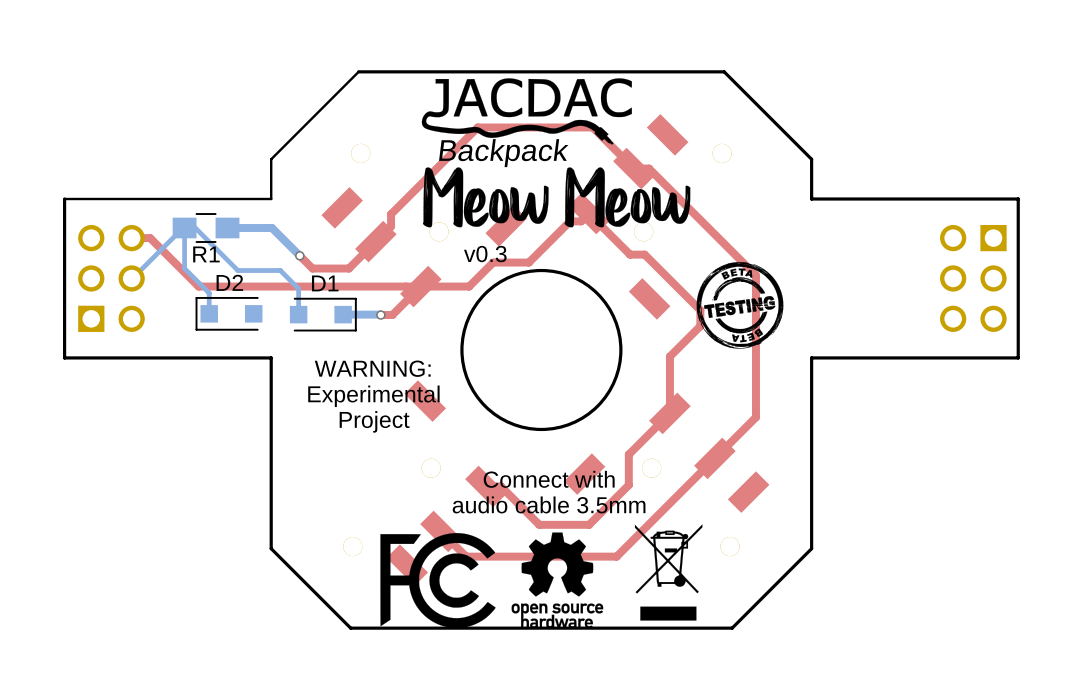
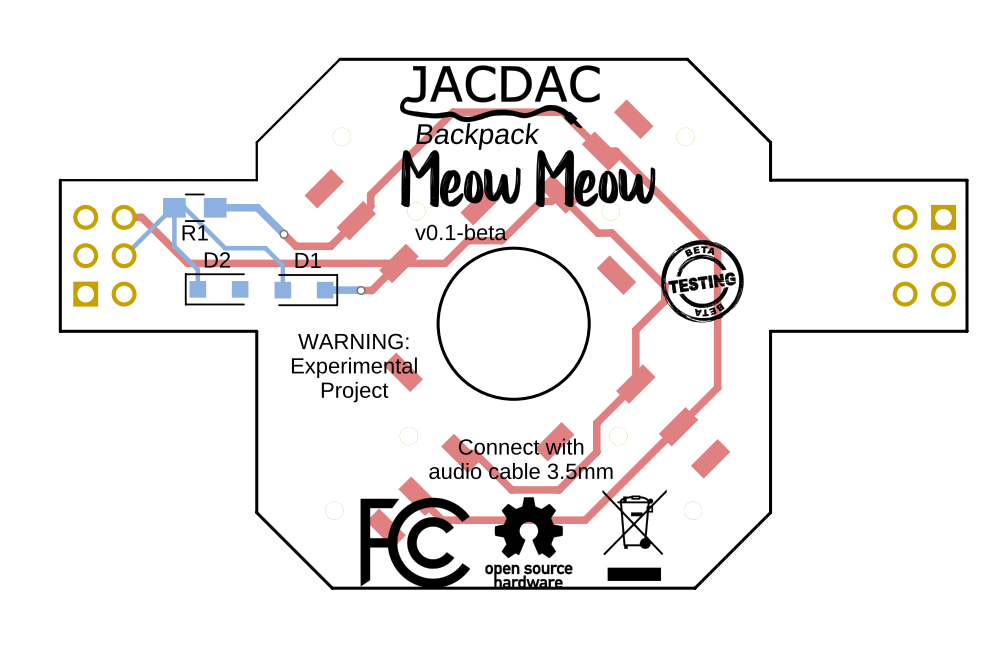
text: v0.3 (485, 254) -> v0.1-beta (460, 232)

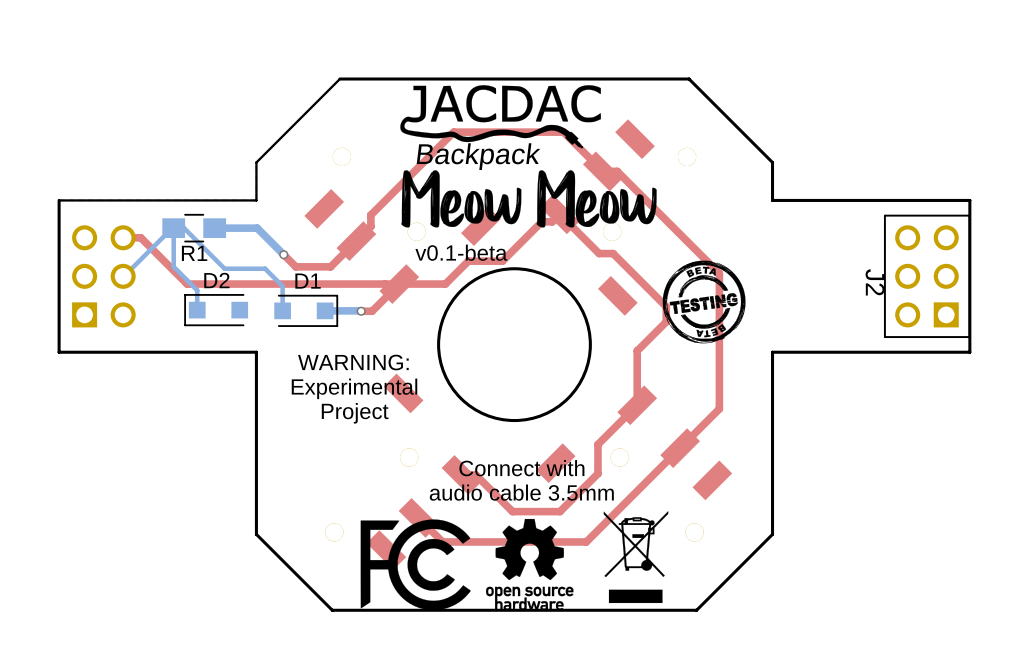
J2 side: top (924, 255) -> bottom (927, 276)

